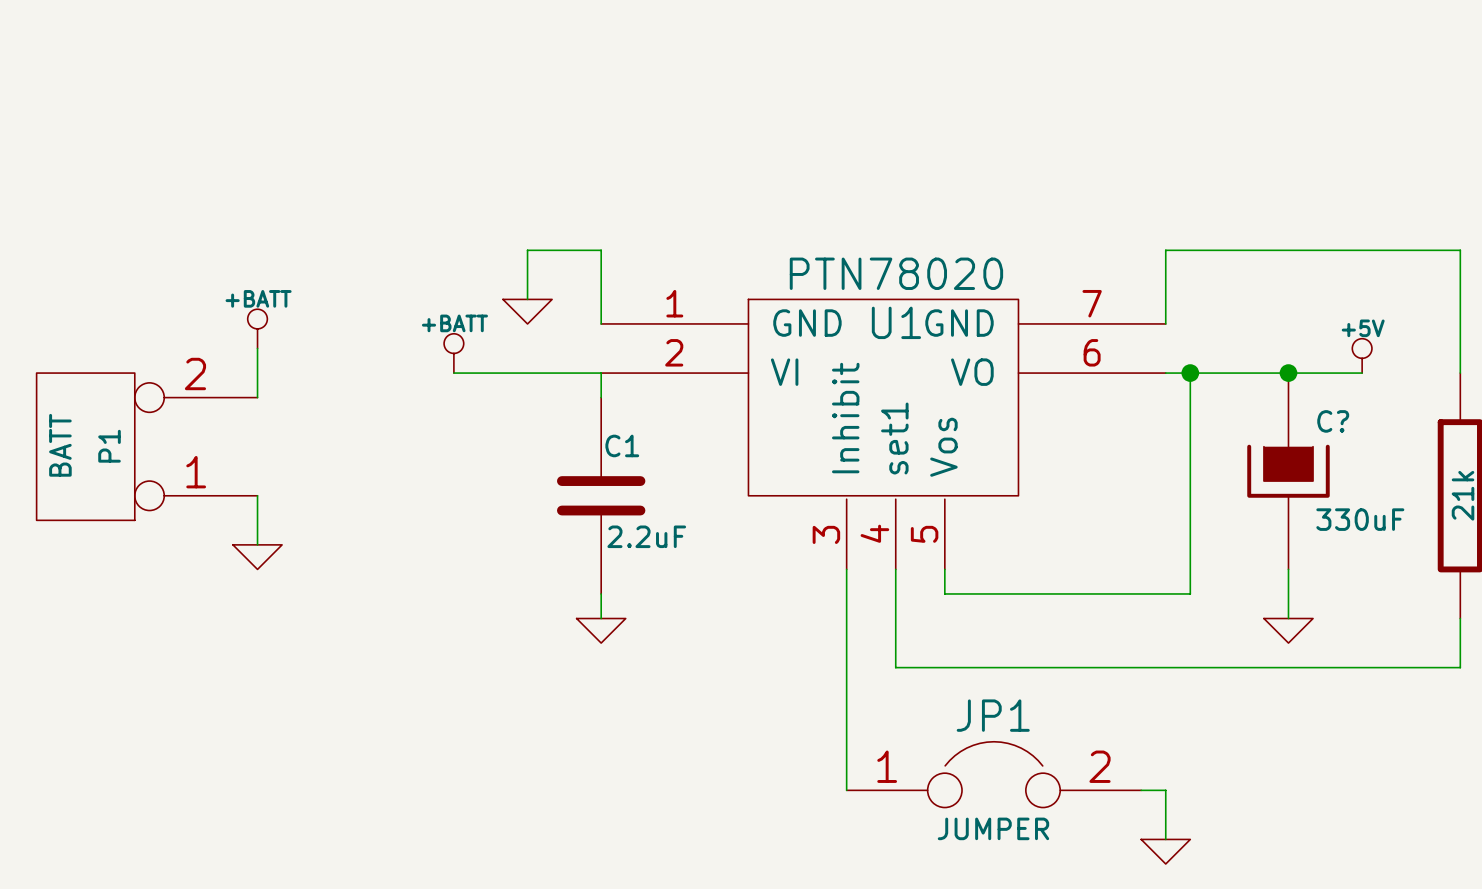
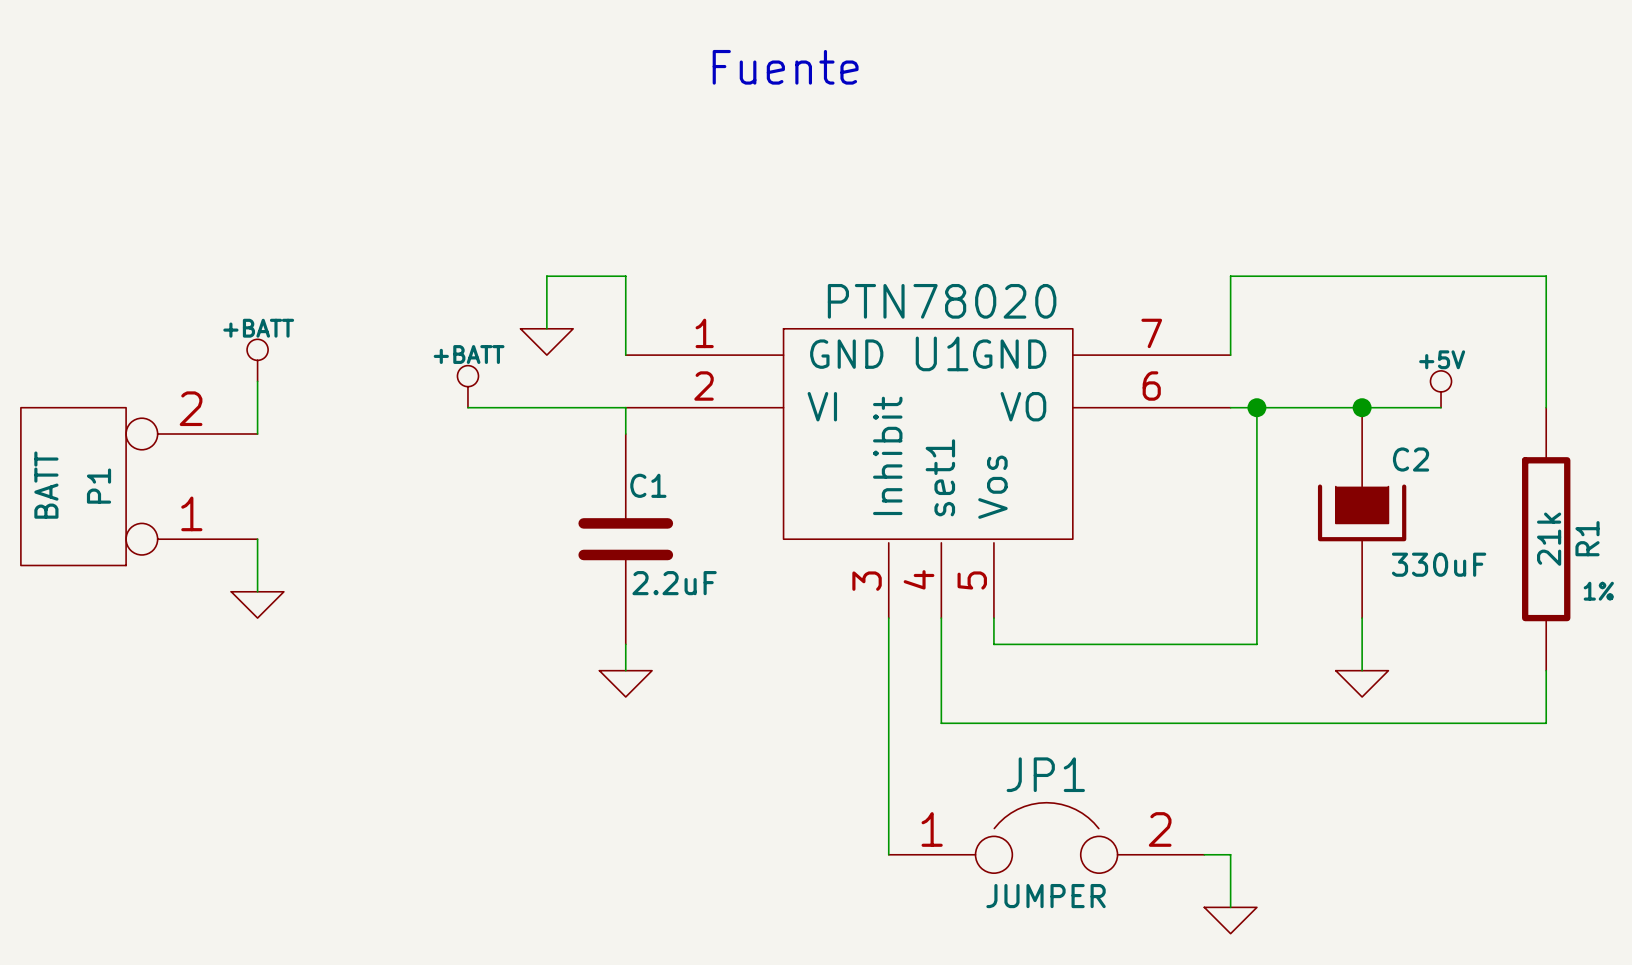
text: none -> Fuente (785, 67)
C? name: C? (1333, 421) -> C2 (1411, 459)

